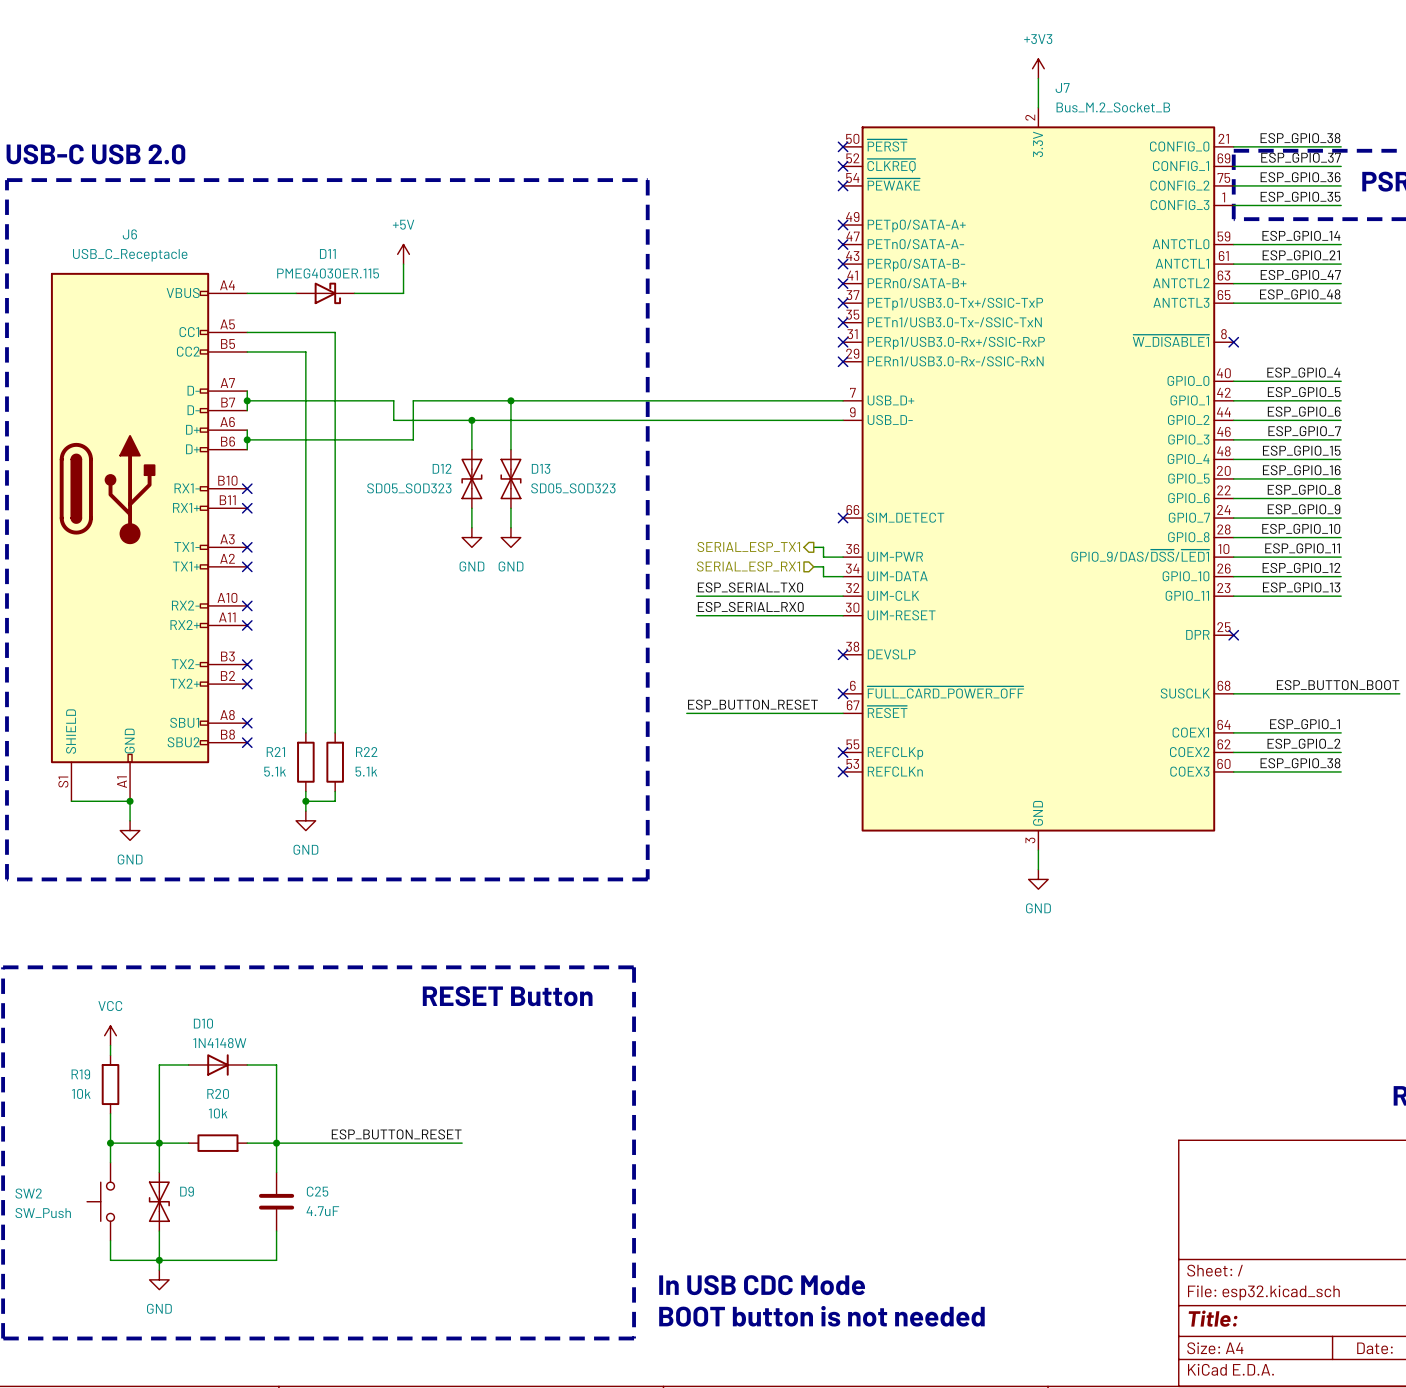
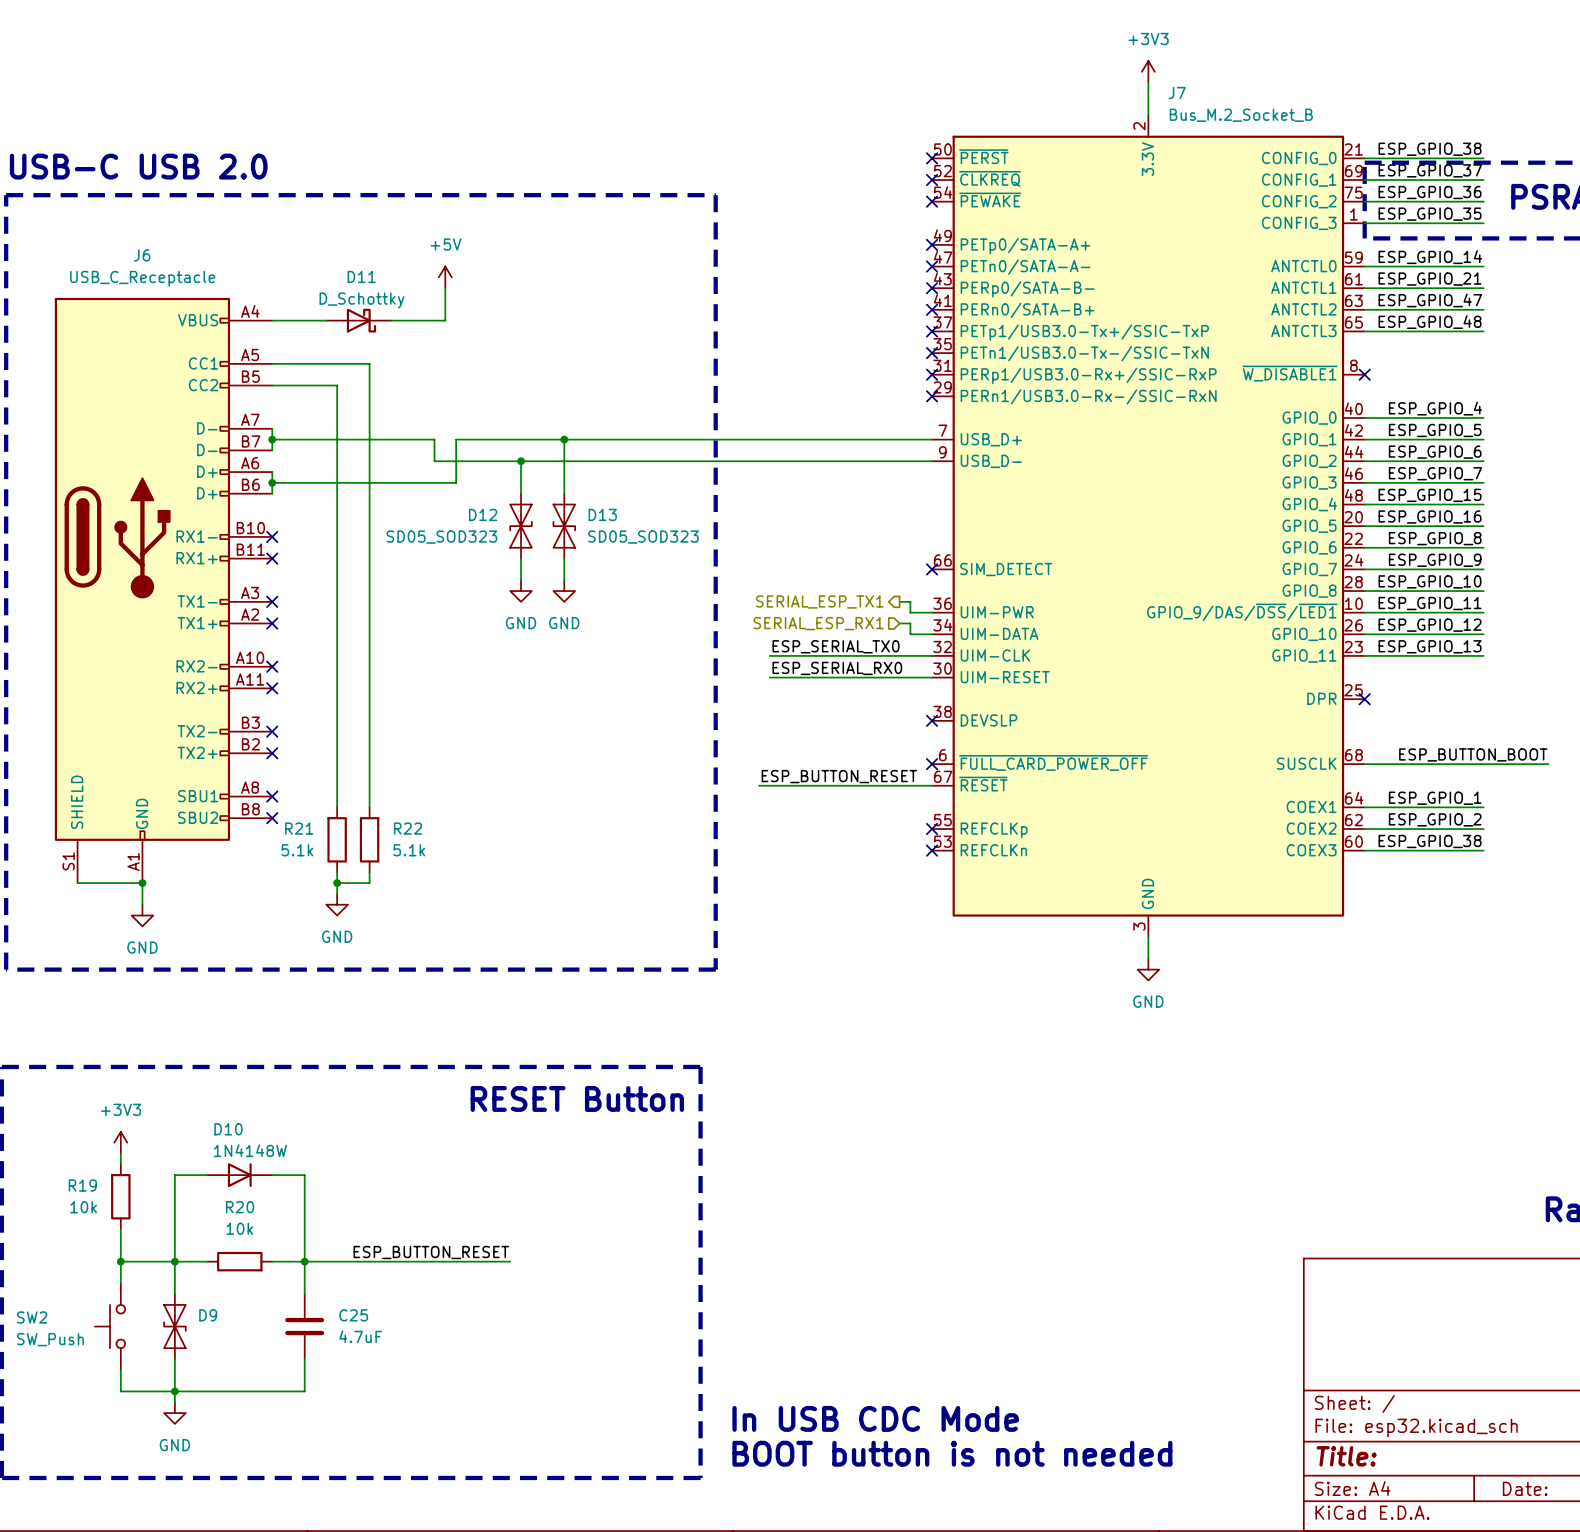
D11 value: PMEG4030ER.115 (328, 273) -> D_Schottky (361, 300)
power symbol: VCC (110, 1035) -> +3V3 (120, 1142)

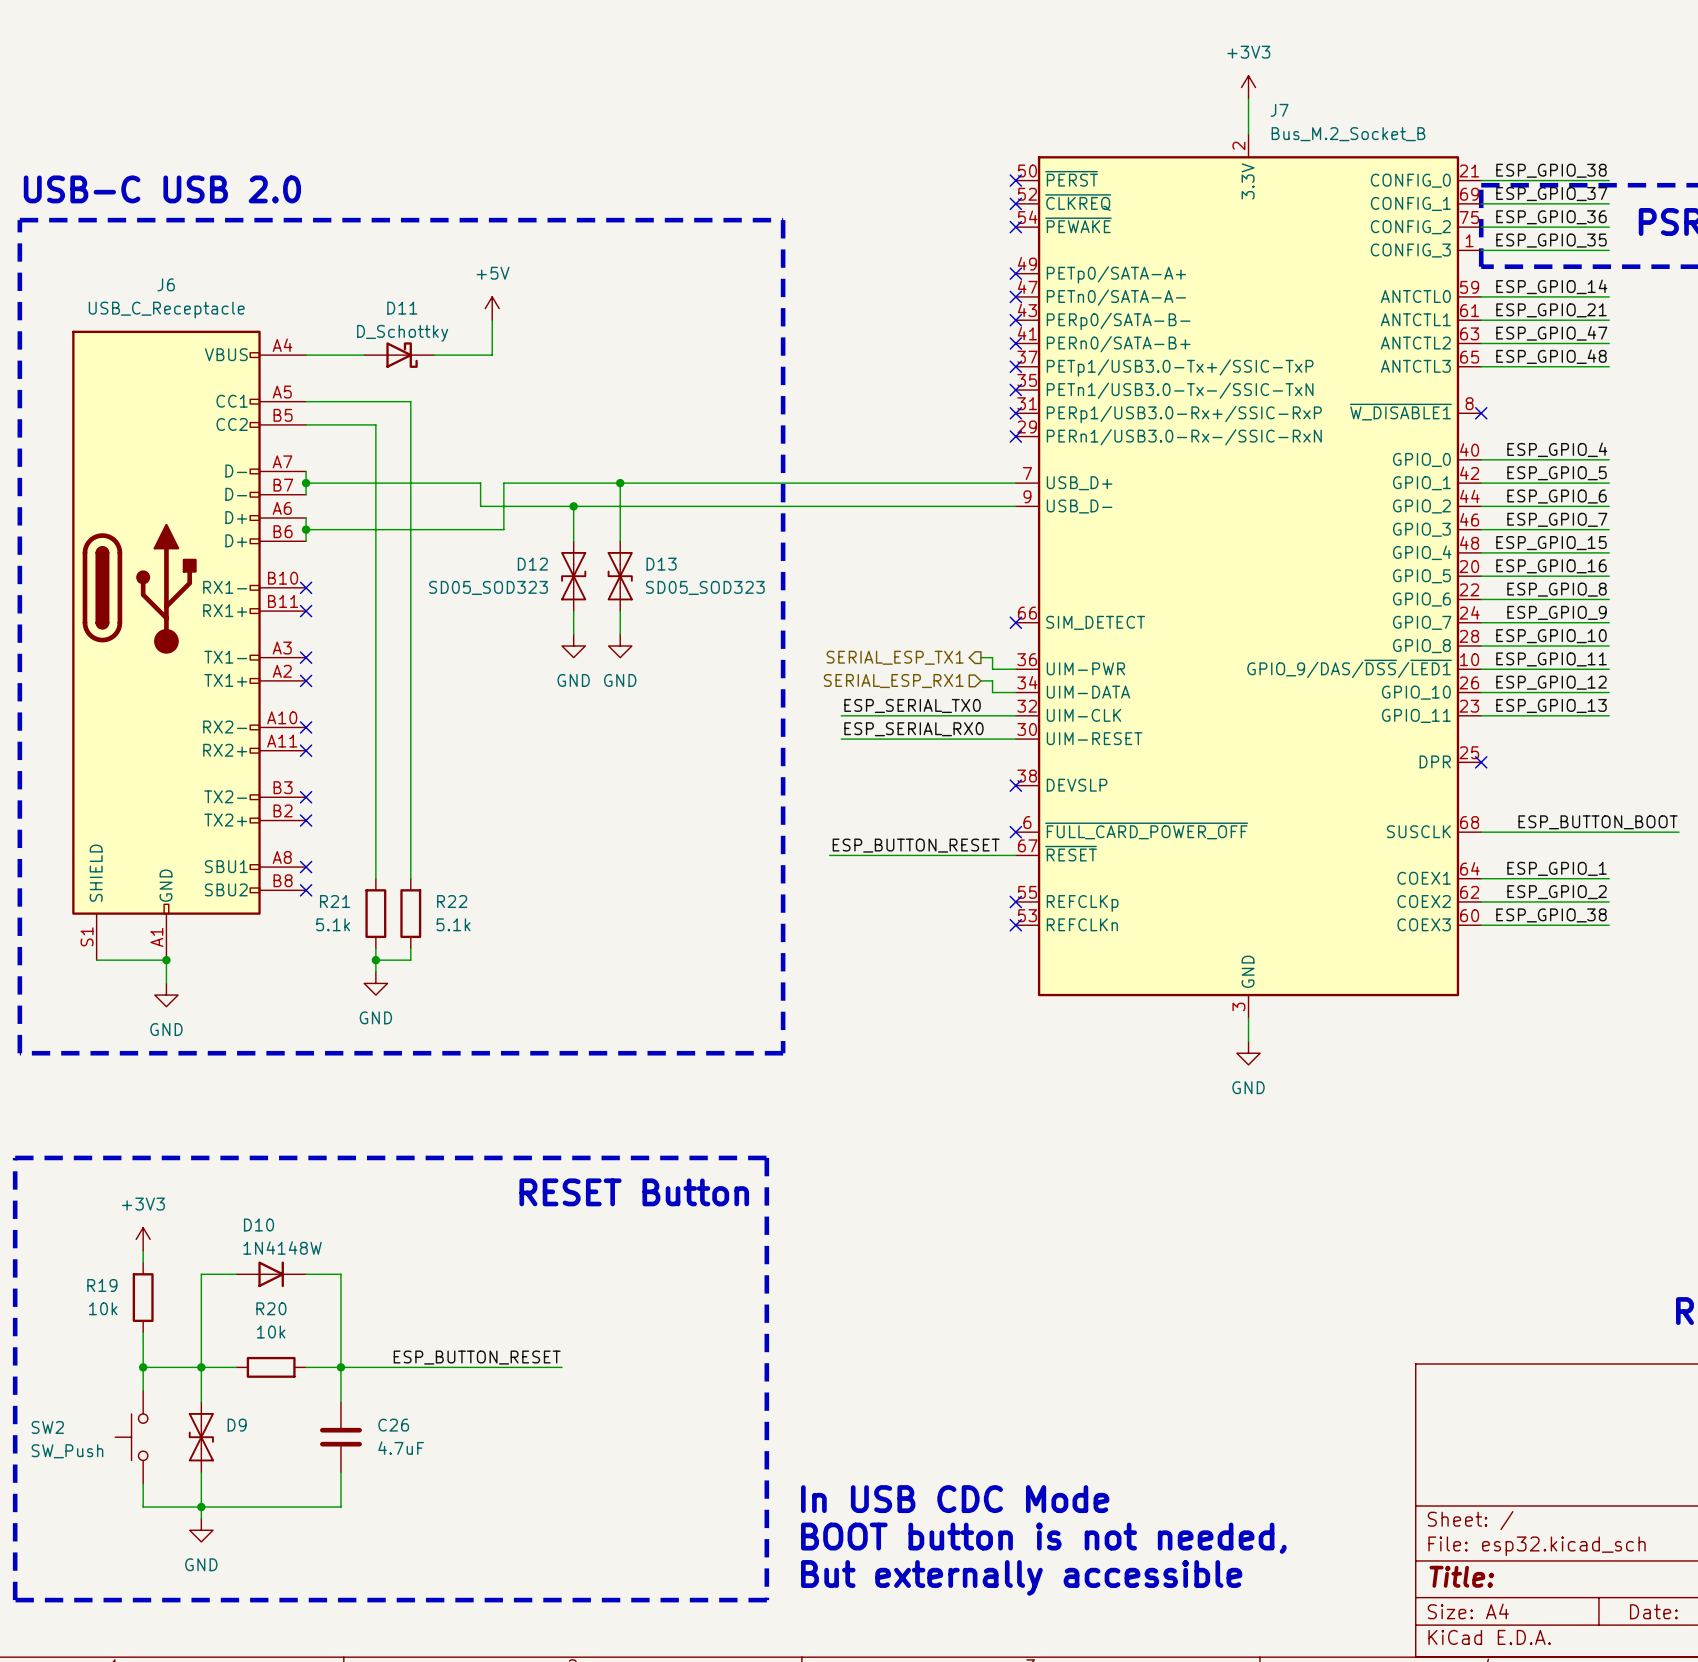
C25 name: C25 (353, 1315) -> C26 (393, 1425)
text: none -> In USB CDC Mode (955, 1499)
text: In USB CDC Mode (875, 1418) -> BOOT button is not needed, (1043, 1538)
text: BOOT button is not needed (952, 1453) -> But externally accessible (1021, 1577)

